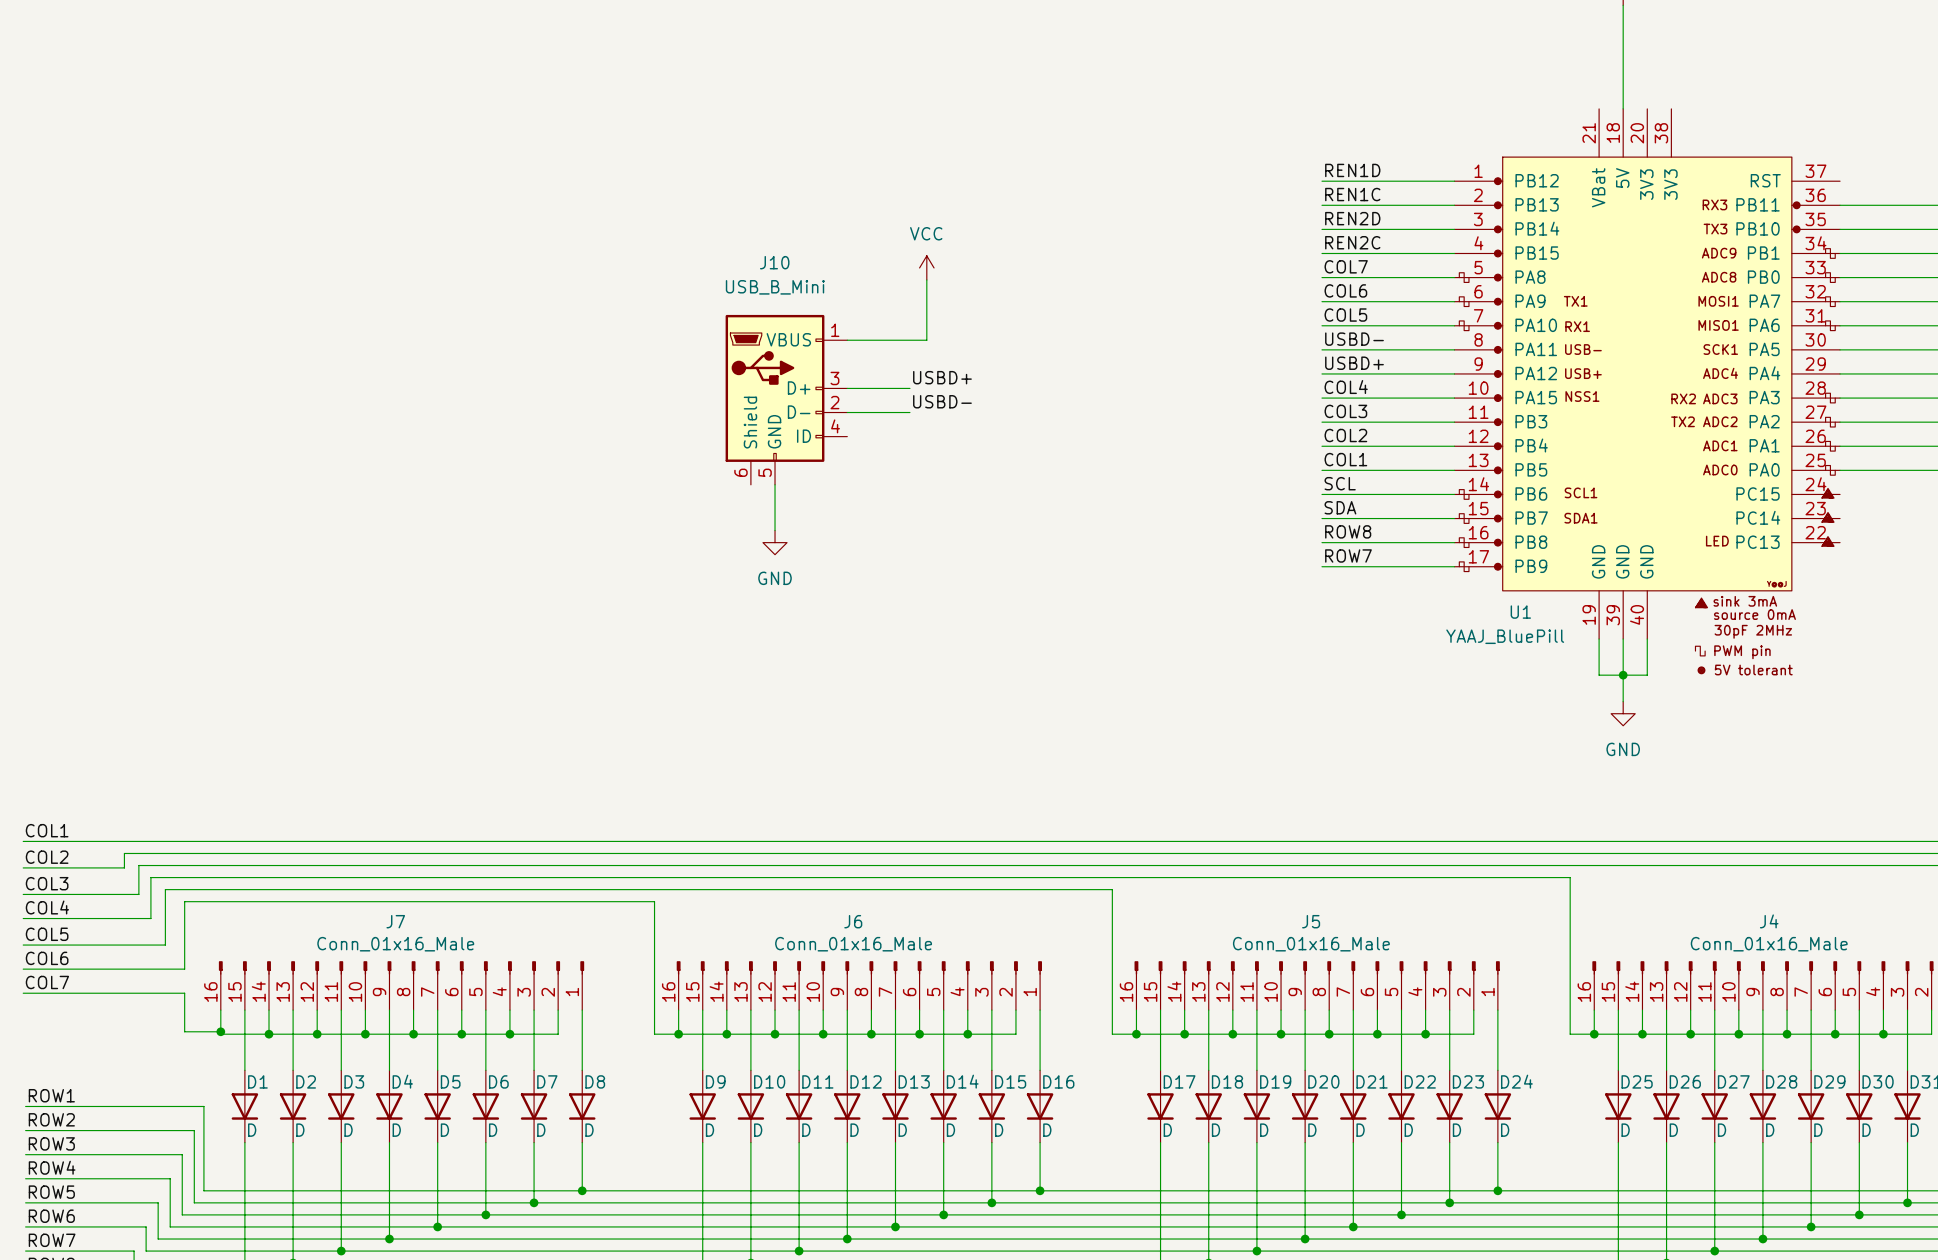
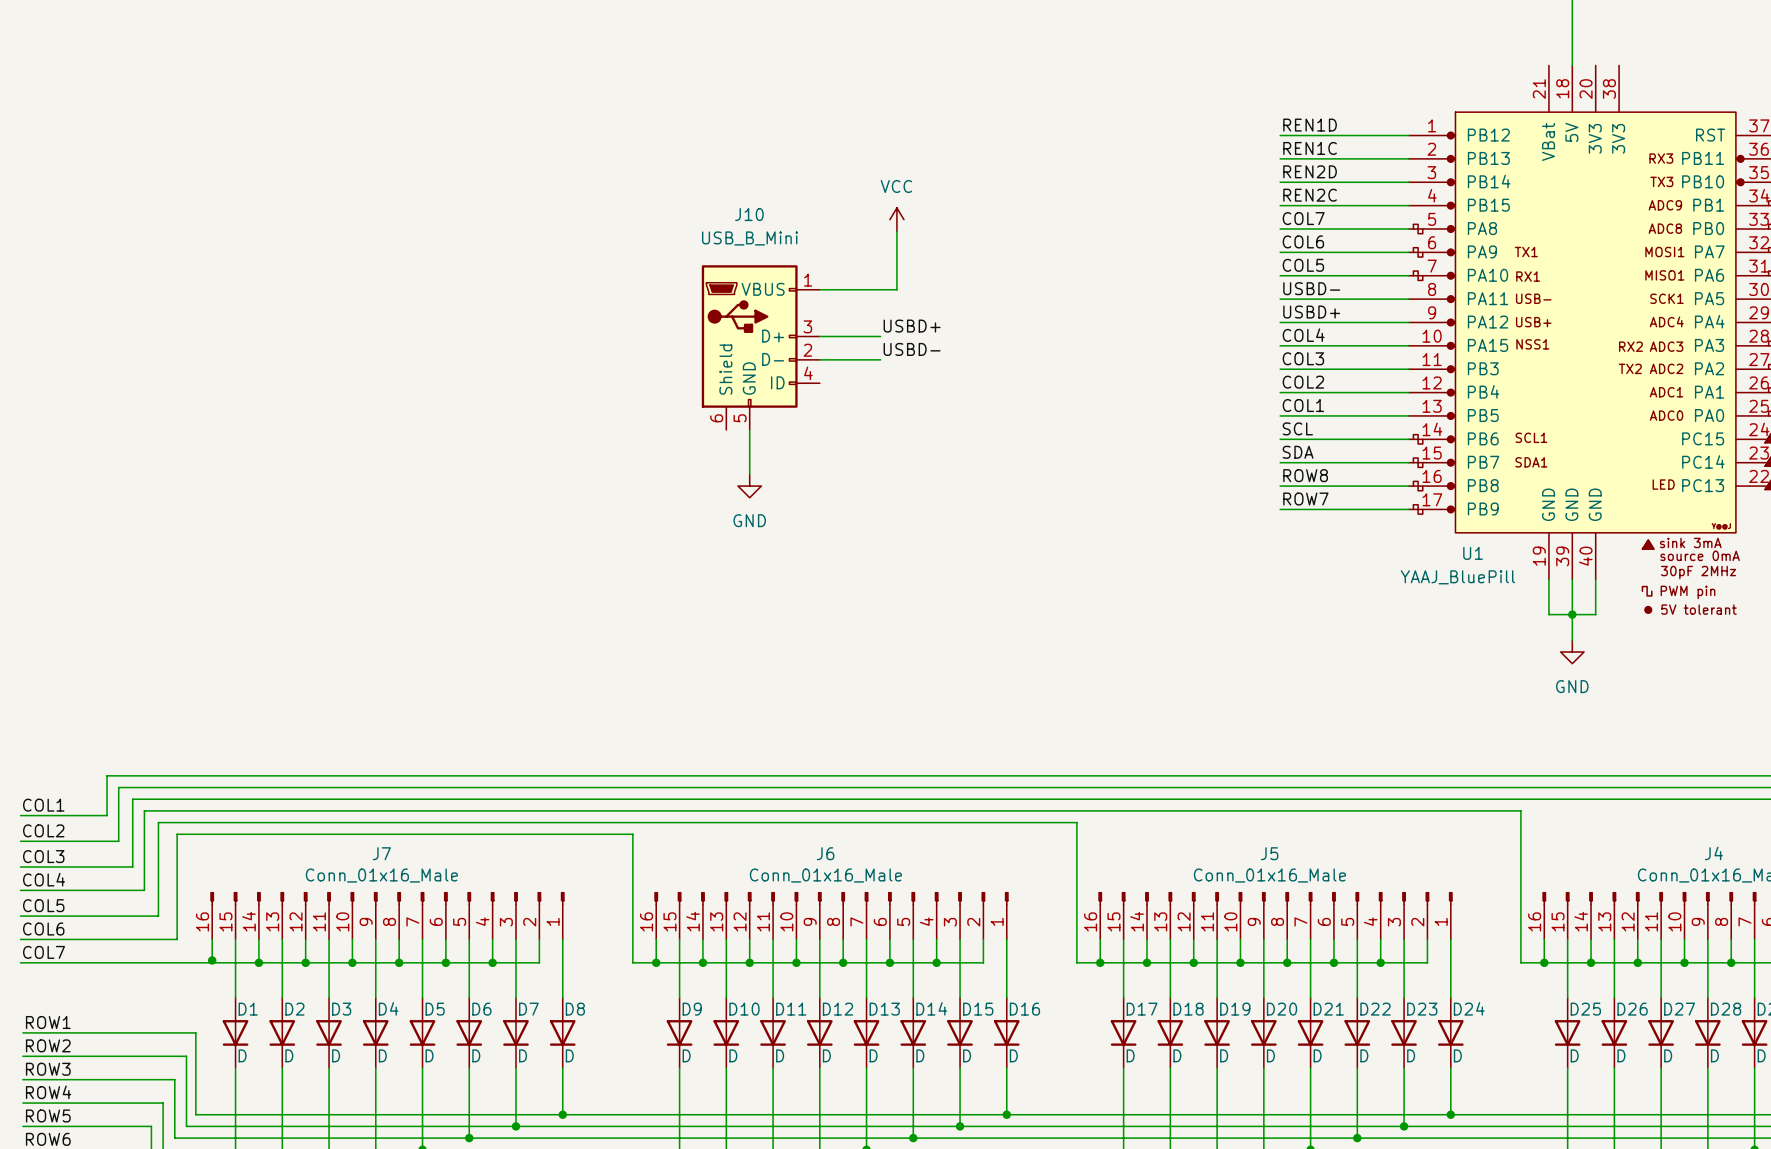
label position: COL1 (47, 830) -> COL1 (43, 805)
wire: (23, 841) (112, 841) -> (20, 815) (107, 815) (107, 775)
label position: COL2 (47, 857) -> COL2 (43, 830)
wire: (23, 867) (124, 867) -> (20, 841) (118, 841) (118, 801)
label position: COL3 (47, 883) -> COL3 (43, 856)
wire: (23, 894) (138, 894) -> (20, 867) (132, 867) (132, 827)
label position: COL4 (47, 907) -> COL4 (44, 879)
wire: (23, 918) (150, 918) -> (20, 890) (144, 890) (144, 850)
label position: COL5 (47, 934) -> COL5 (43, 905)
wire: (23, 945) (165, 945) -> (20, 916) (158, 916) (158, 876)
label position: COL6 (47, 958) -> COL6 (43, 929)
wire: (23, 969) (184, 969) -> (177, 923) (177, 899)
label position: COL7 (47, 982) -> COL7 (44, 952)
wire: (23, 993) (184, 993) -> none
wire: (184, 1010) (184, 1031) (220, 1031) -> (177, 939) (20, 939)
wire: none -> (20, 962) (212, 962)

